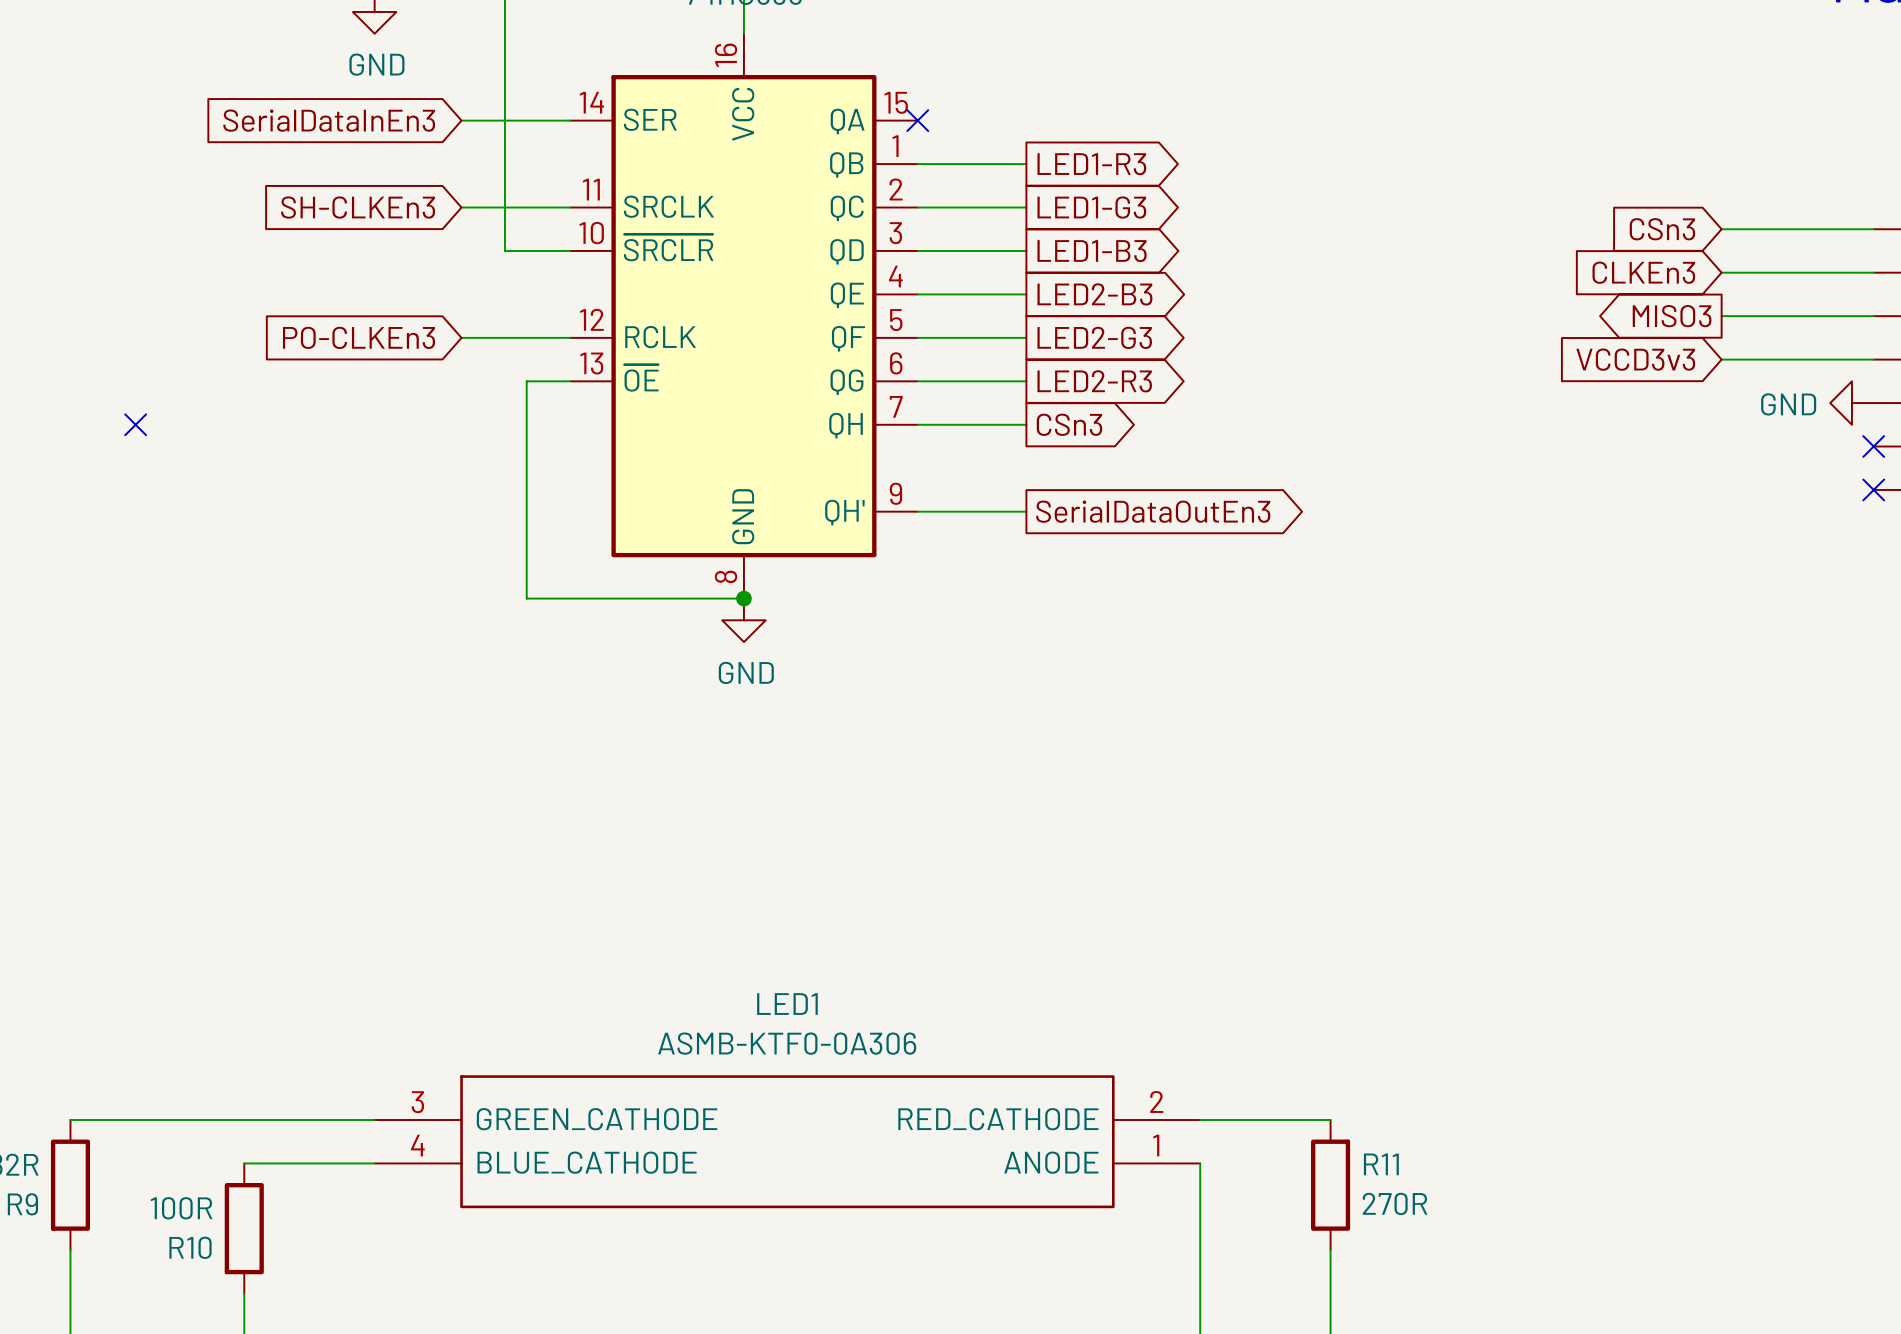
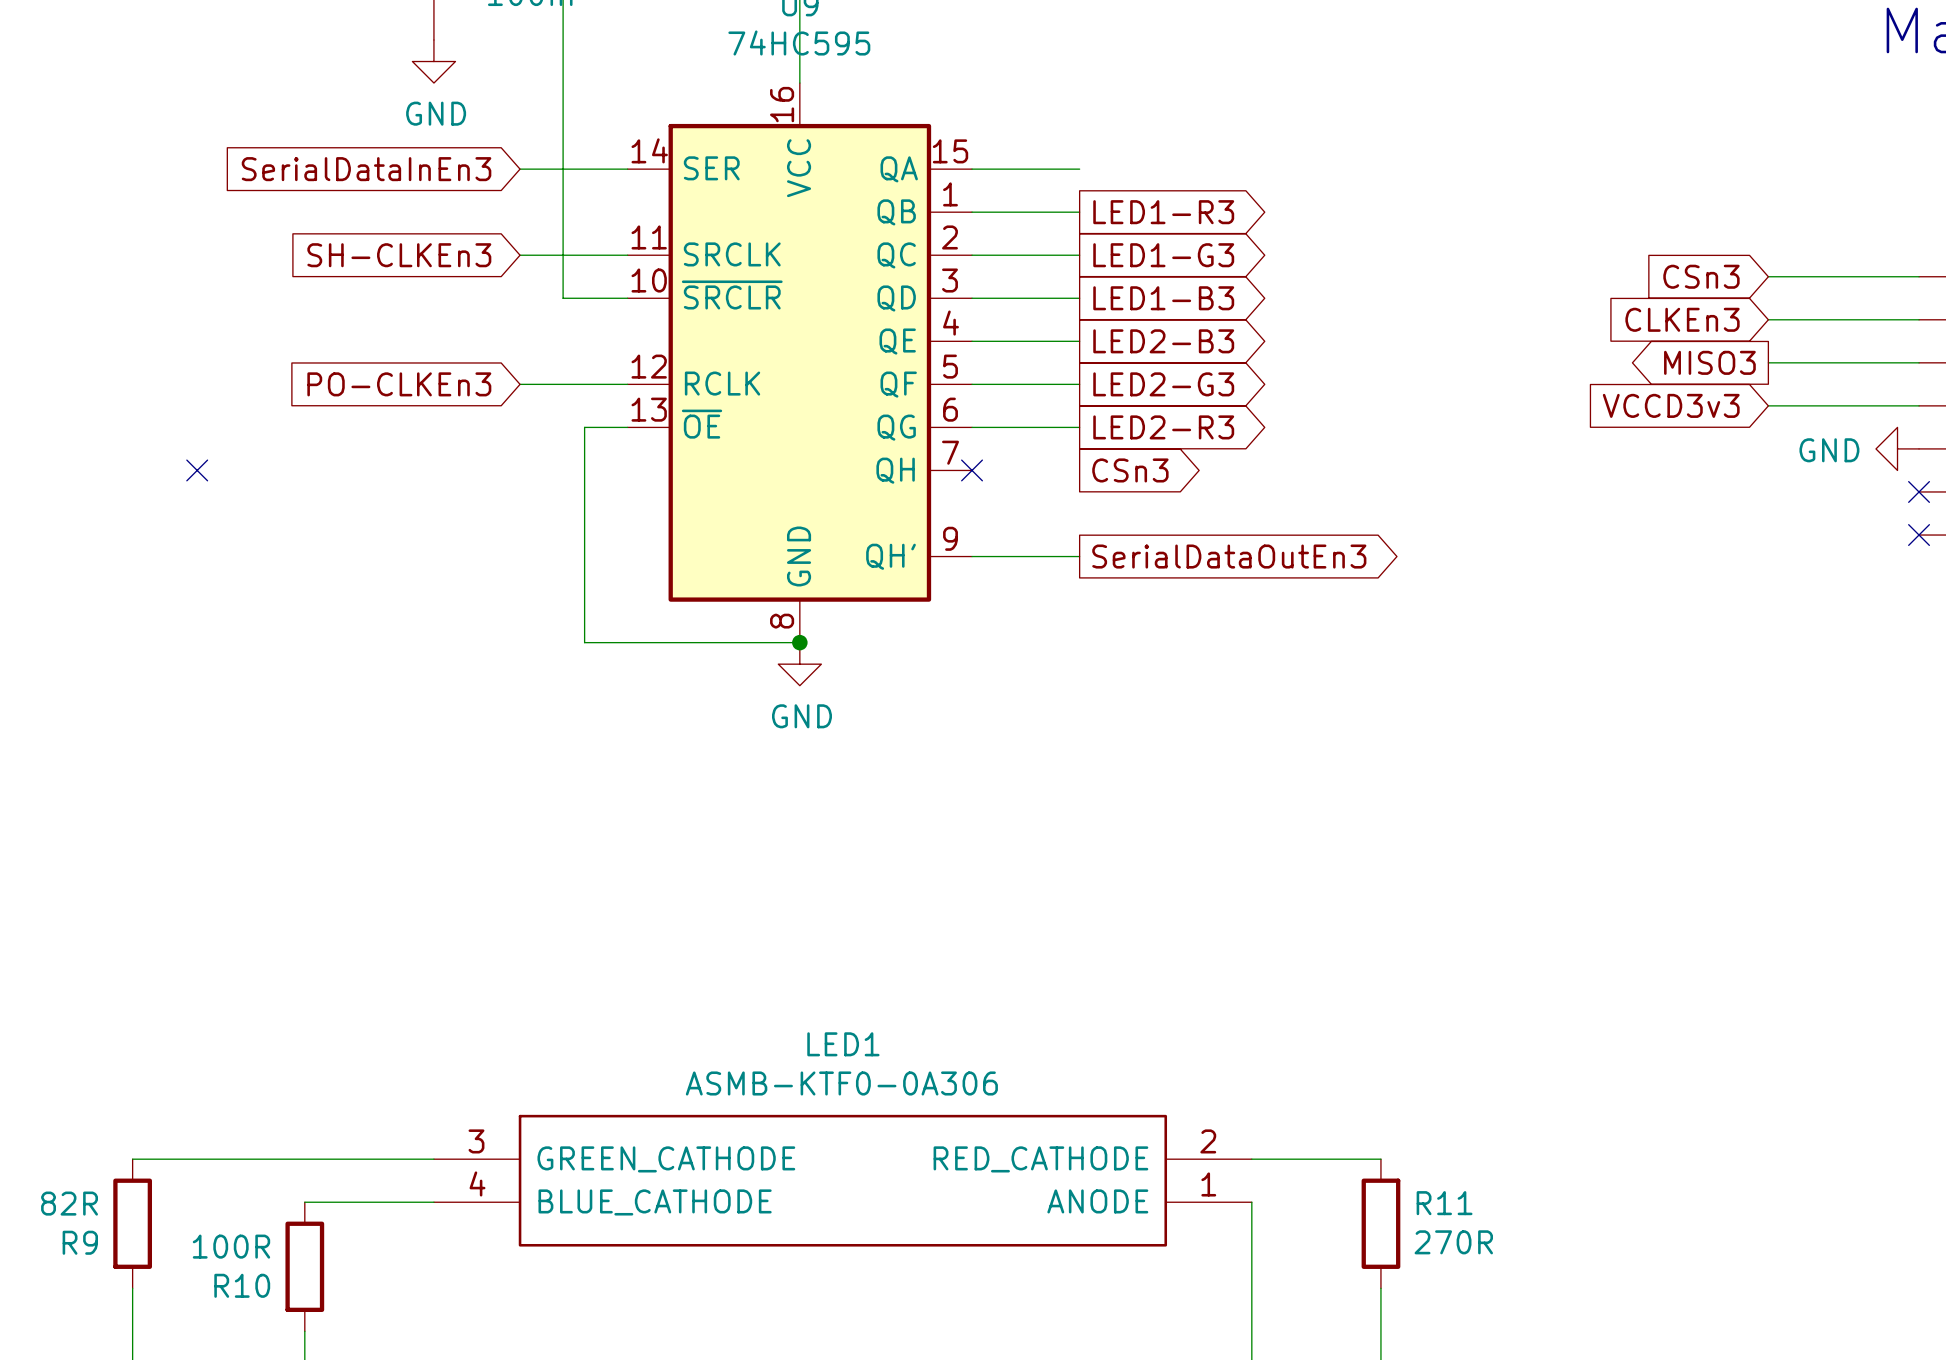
no-connect mark: (917, 120) -> none
wire: (917, 424) (1026, 424) -> (972, 169) (1079, 169)
no-connect mark: none -> (972, 470)

